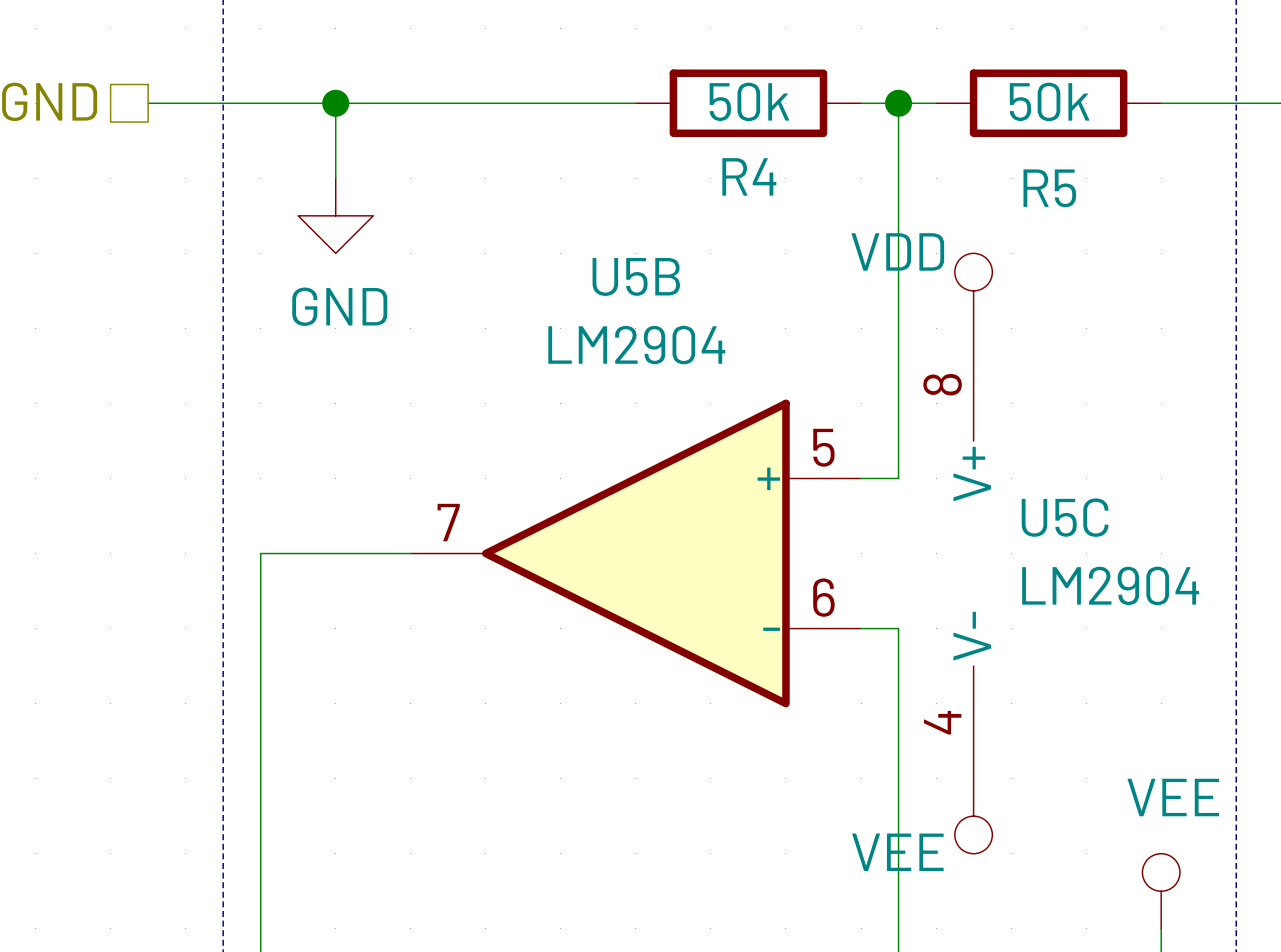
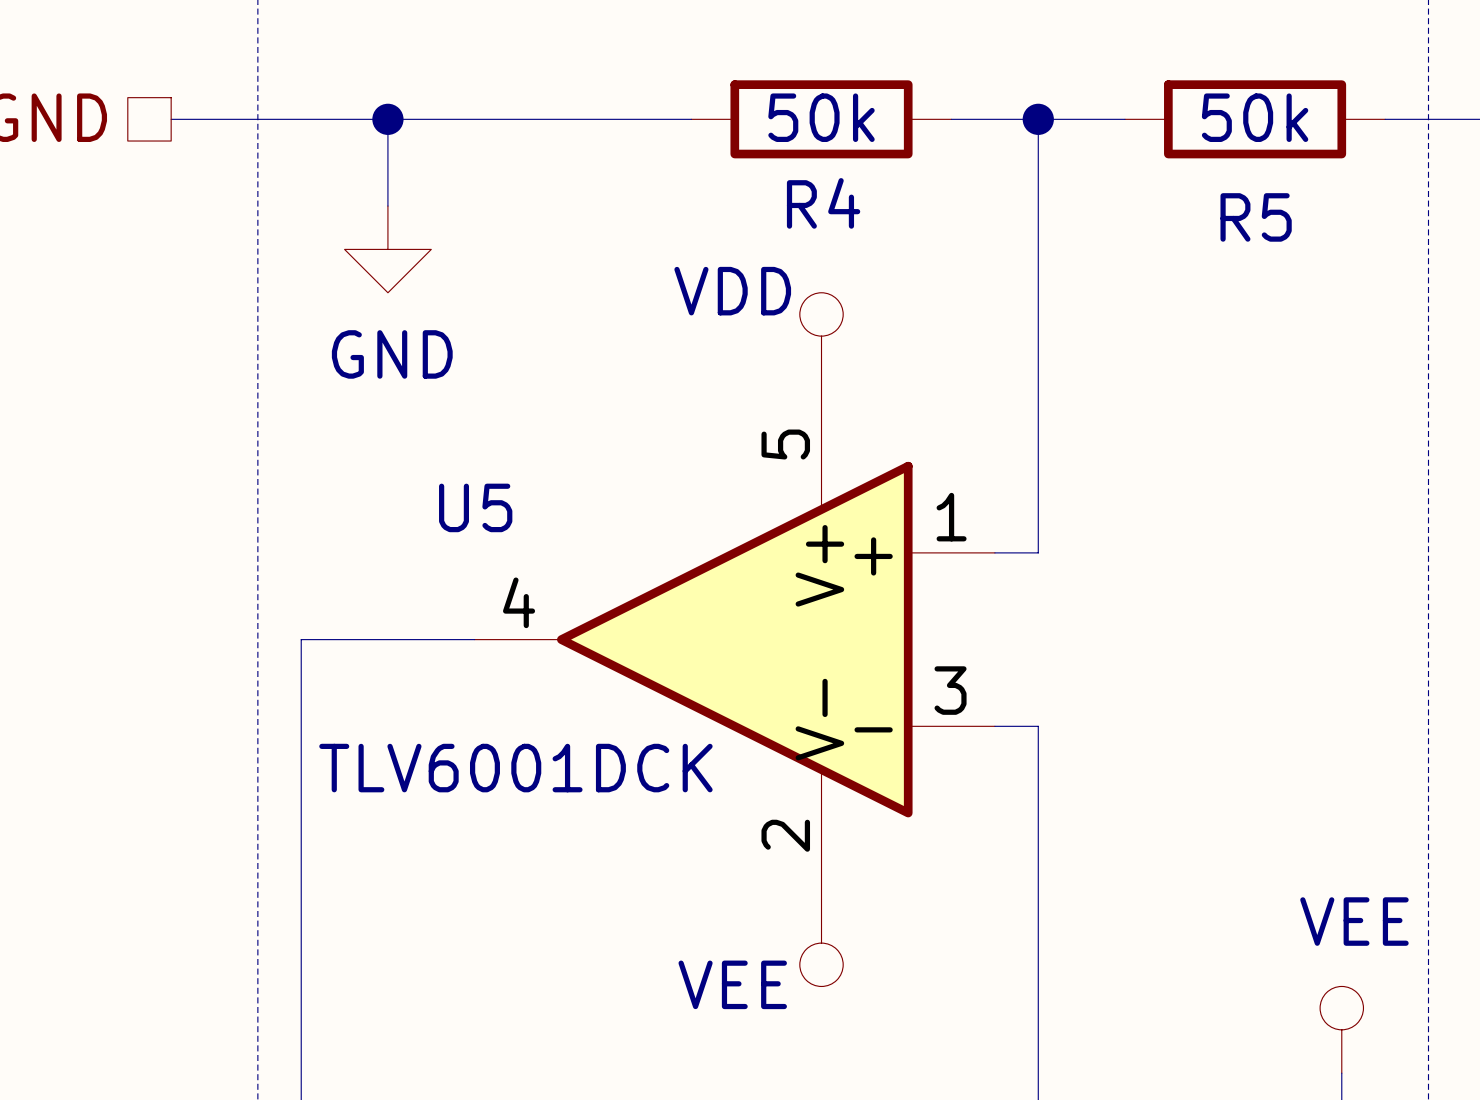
R4 position: (748, 103) -> (821, 119)
R5 position: (1048, 103) -> (1255, 119)
power symbol position: VDD (973, 290) -> VDD (821, 336)
U5B: LM2904 (635, 553) -> none
U5: none -> TLV6001DCK (734, 639)
U5C: LM2904 (973, 553) -> none
power symbol position: VEE (973, 816) -> VEE (821, 943)

